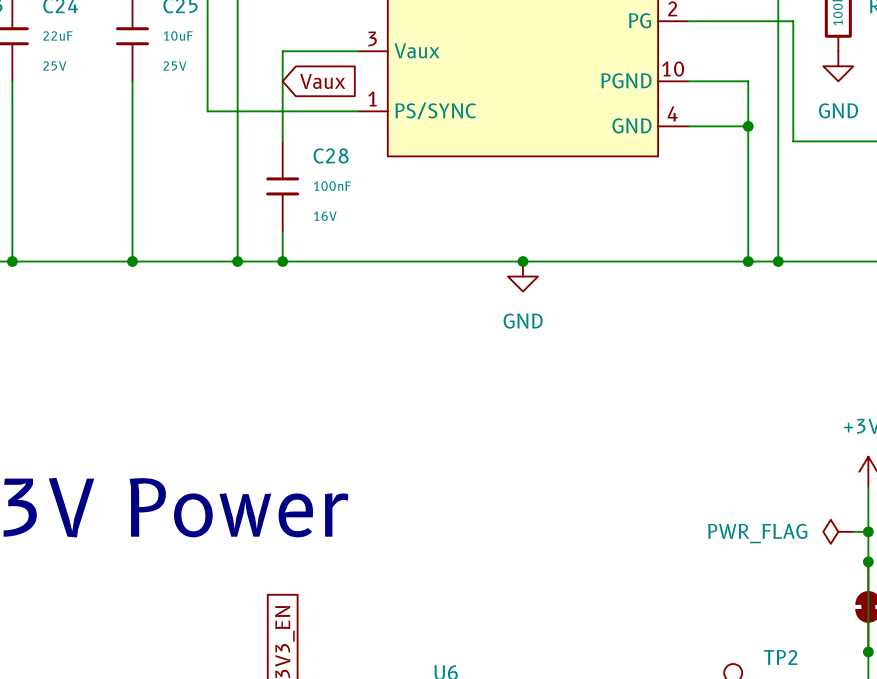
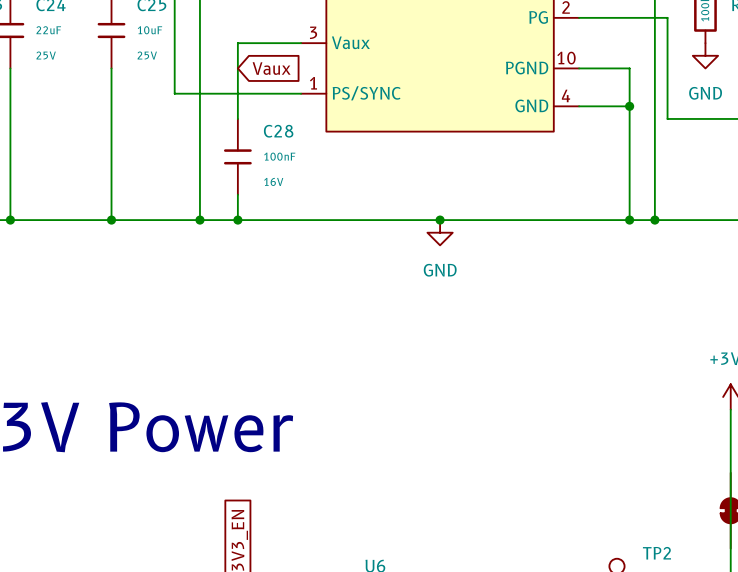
power symbol: PWR_FLAG (838, 531) -> none
wire: (853, 531) (868, 531) -> none
junction: (868, 531) -> none
junction: (868, 561) -> none
junction: (868, 651) -> none

